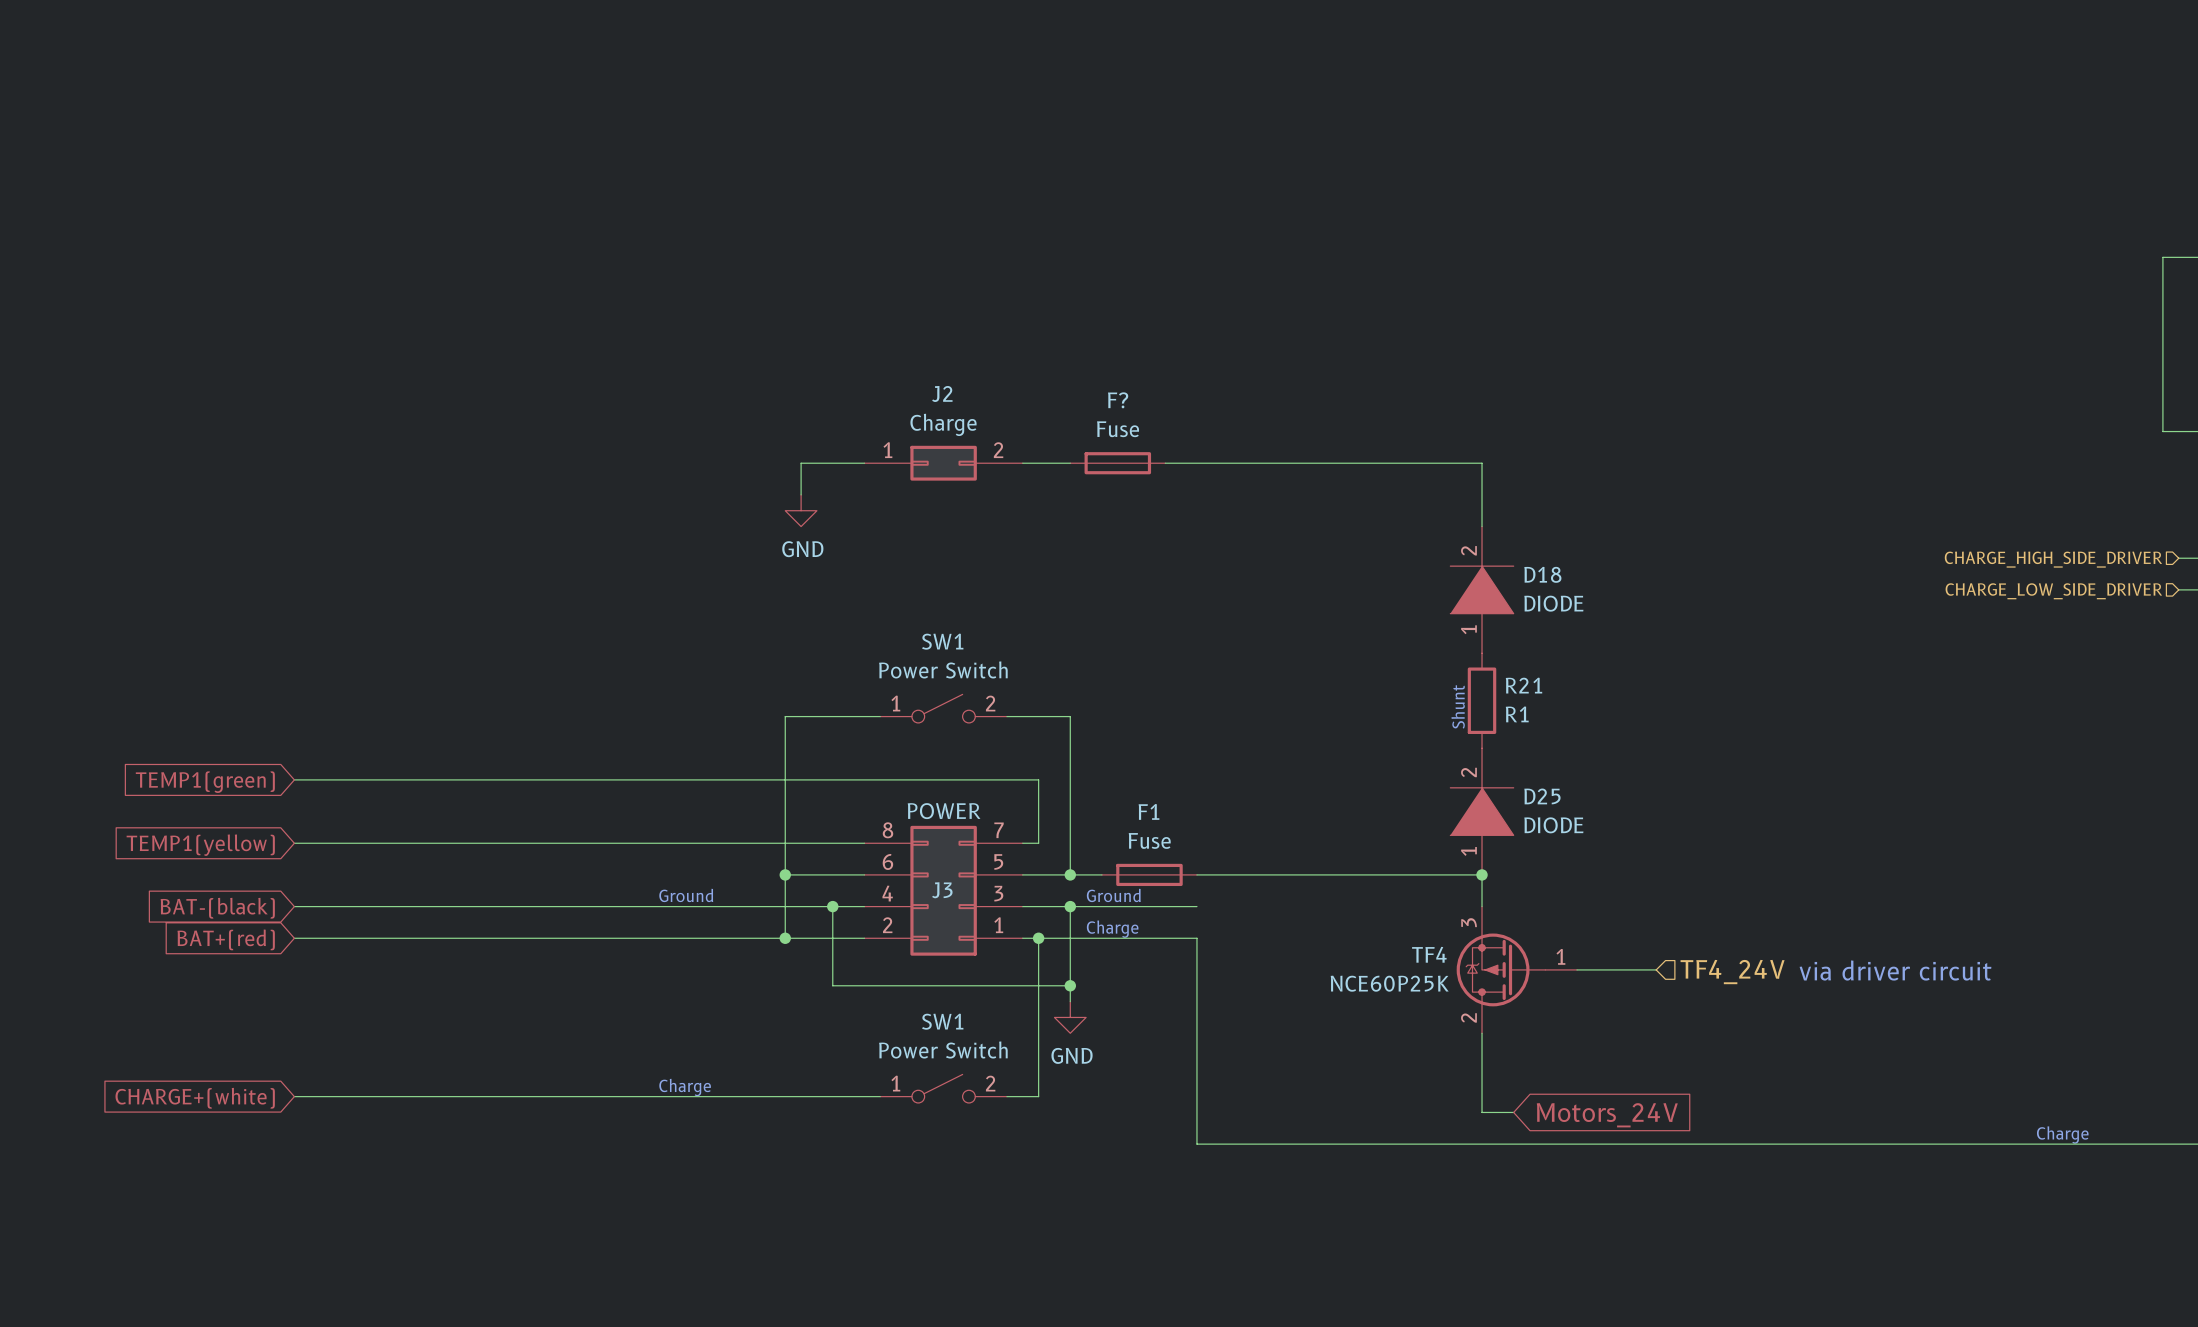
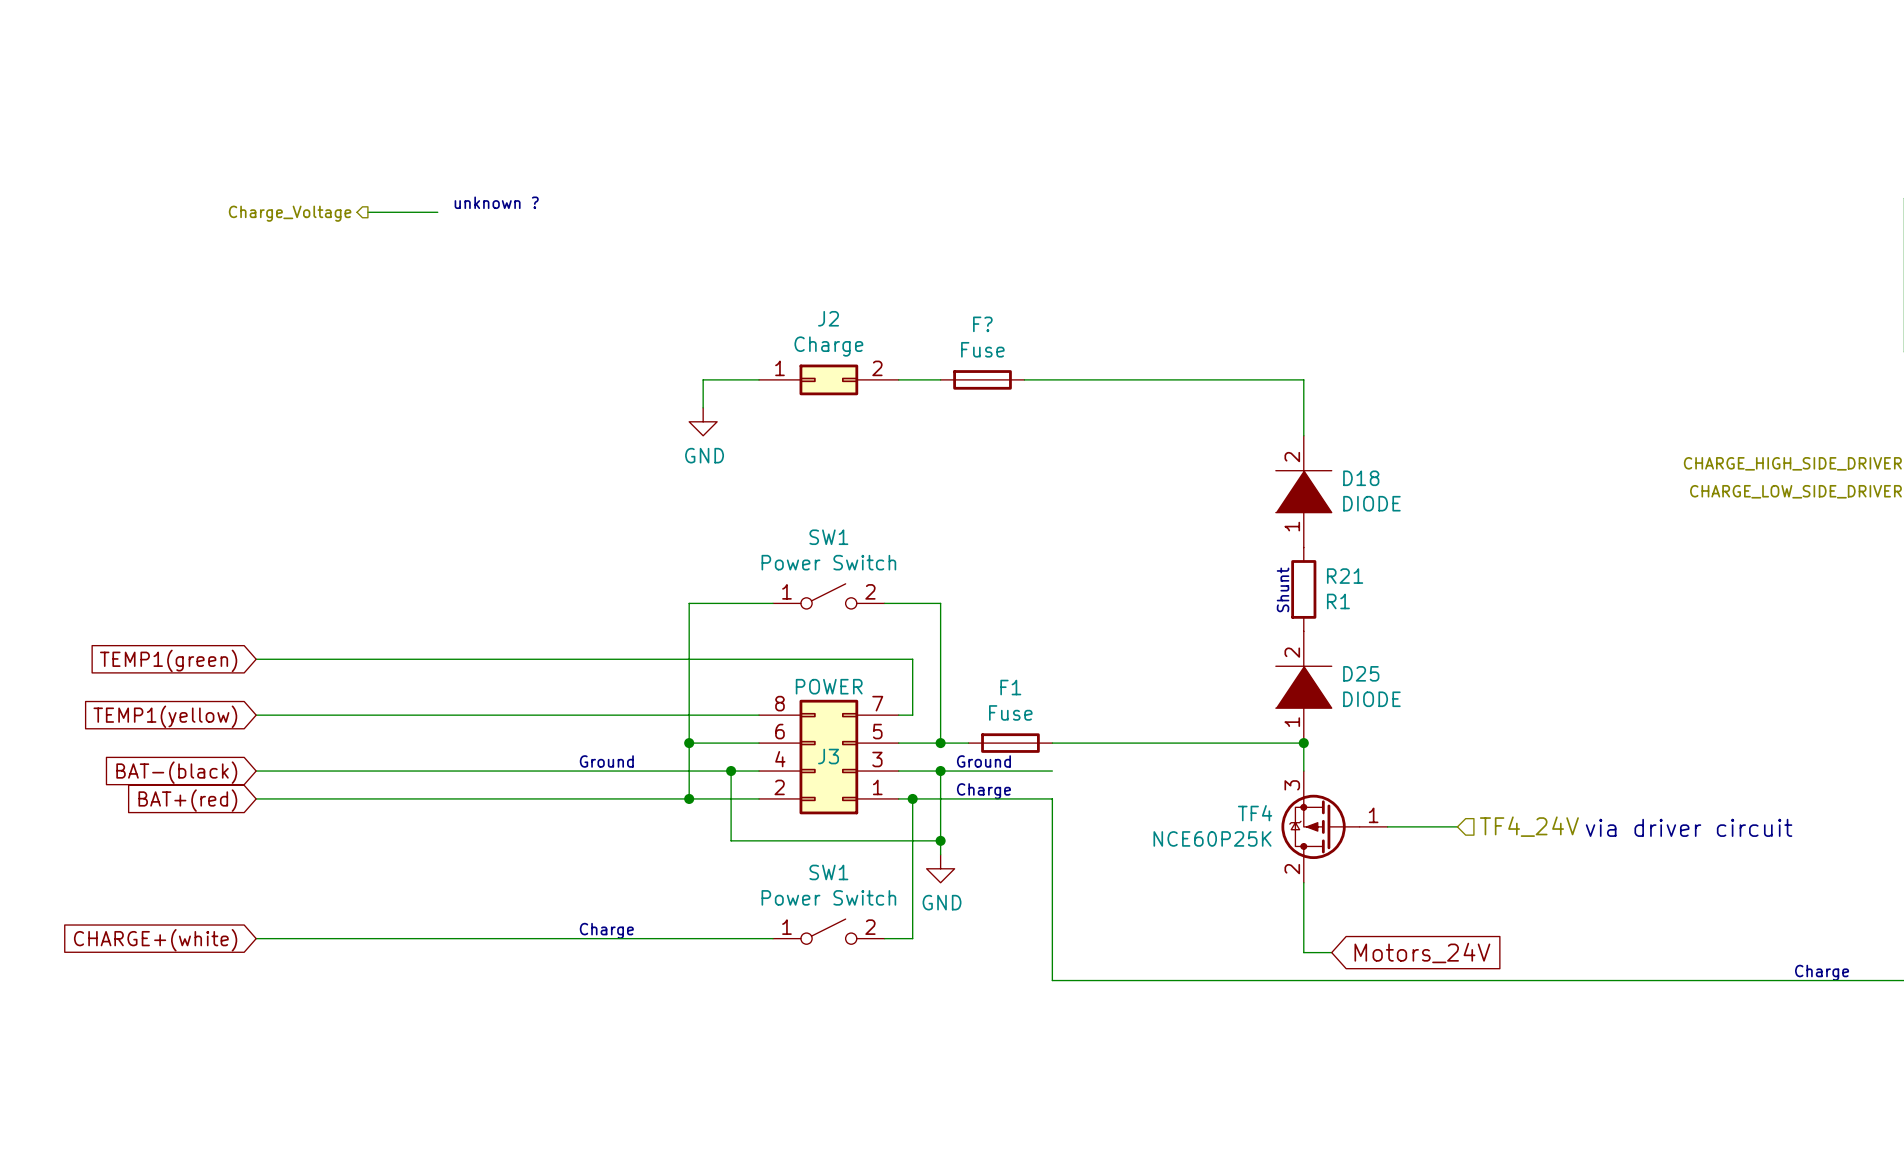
text: none -> unknown ? (496, 202)
wire: none -> (367, 212) (437, 212)
hierarchical label: none -> Charge_Voltage (290, 213)

